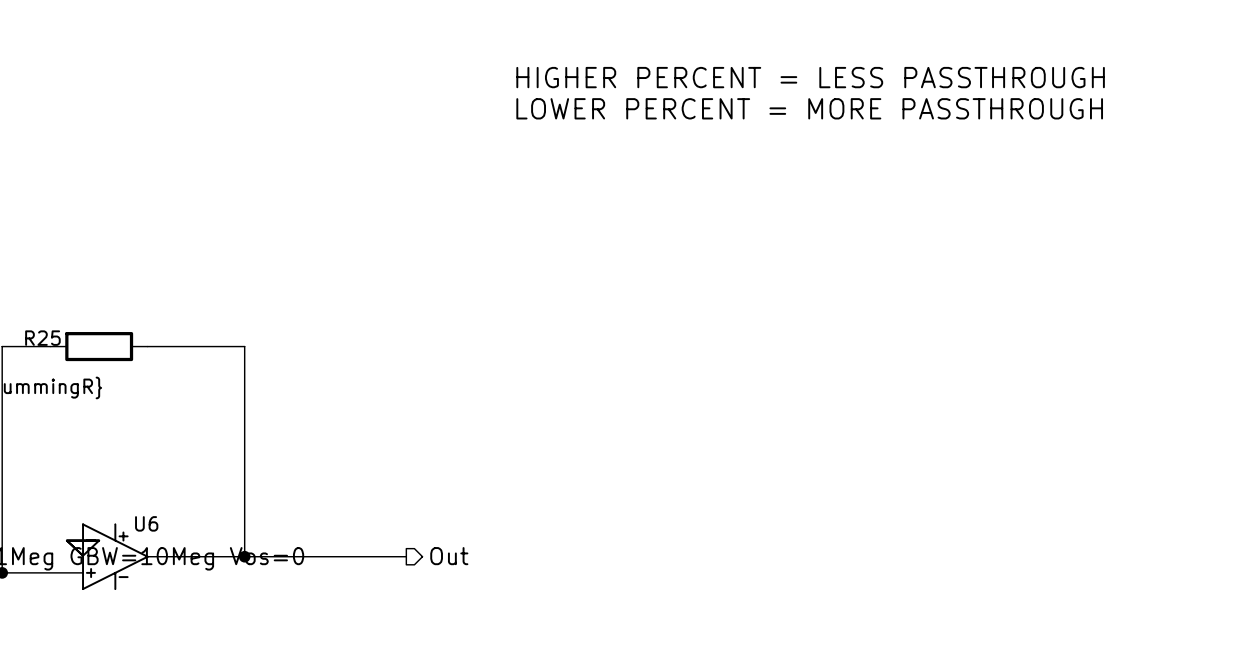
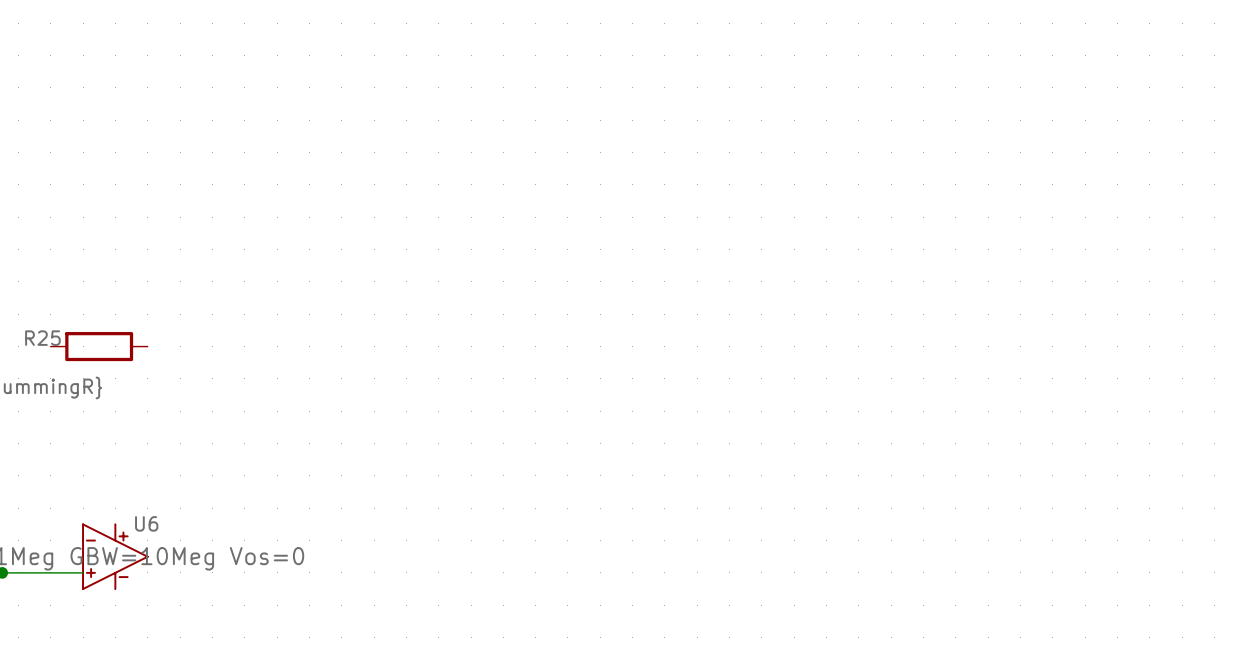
text: HIGHER PERCENT = LESS PASSTHROUGH (810, 77) -> none
text: LOWER PERCENT = MORE PASSTHROUGH (809, 108) -> none
wire: (50, 346) (2, 346) (2, 572) -> none
wire: (147, 346) (244, 346) (244, 556) -> none
power symbol: (83, 548) -> none
wire: (147, 556) (406, 556) -> none
junction: (244, 556) -> none
hierarchical label: Out (449, 556) -> none

